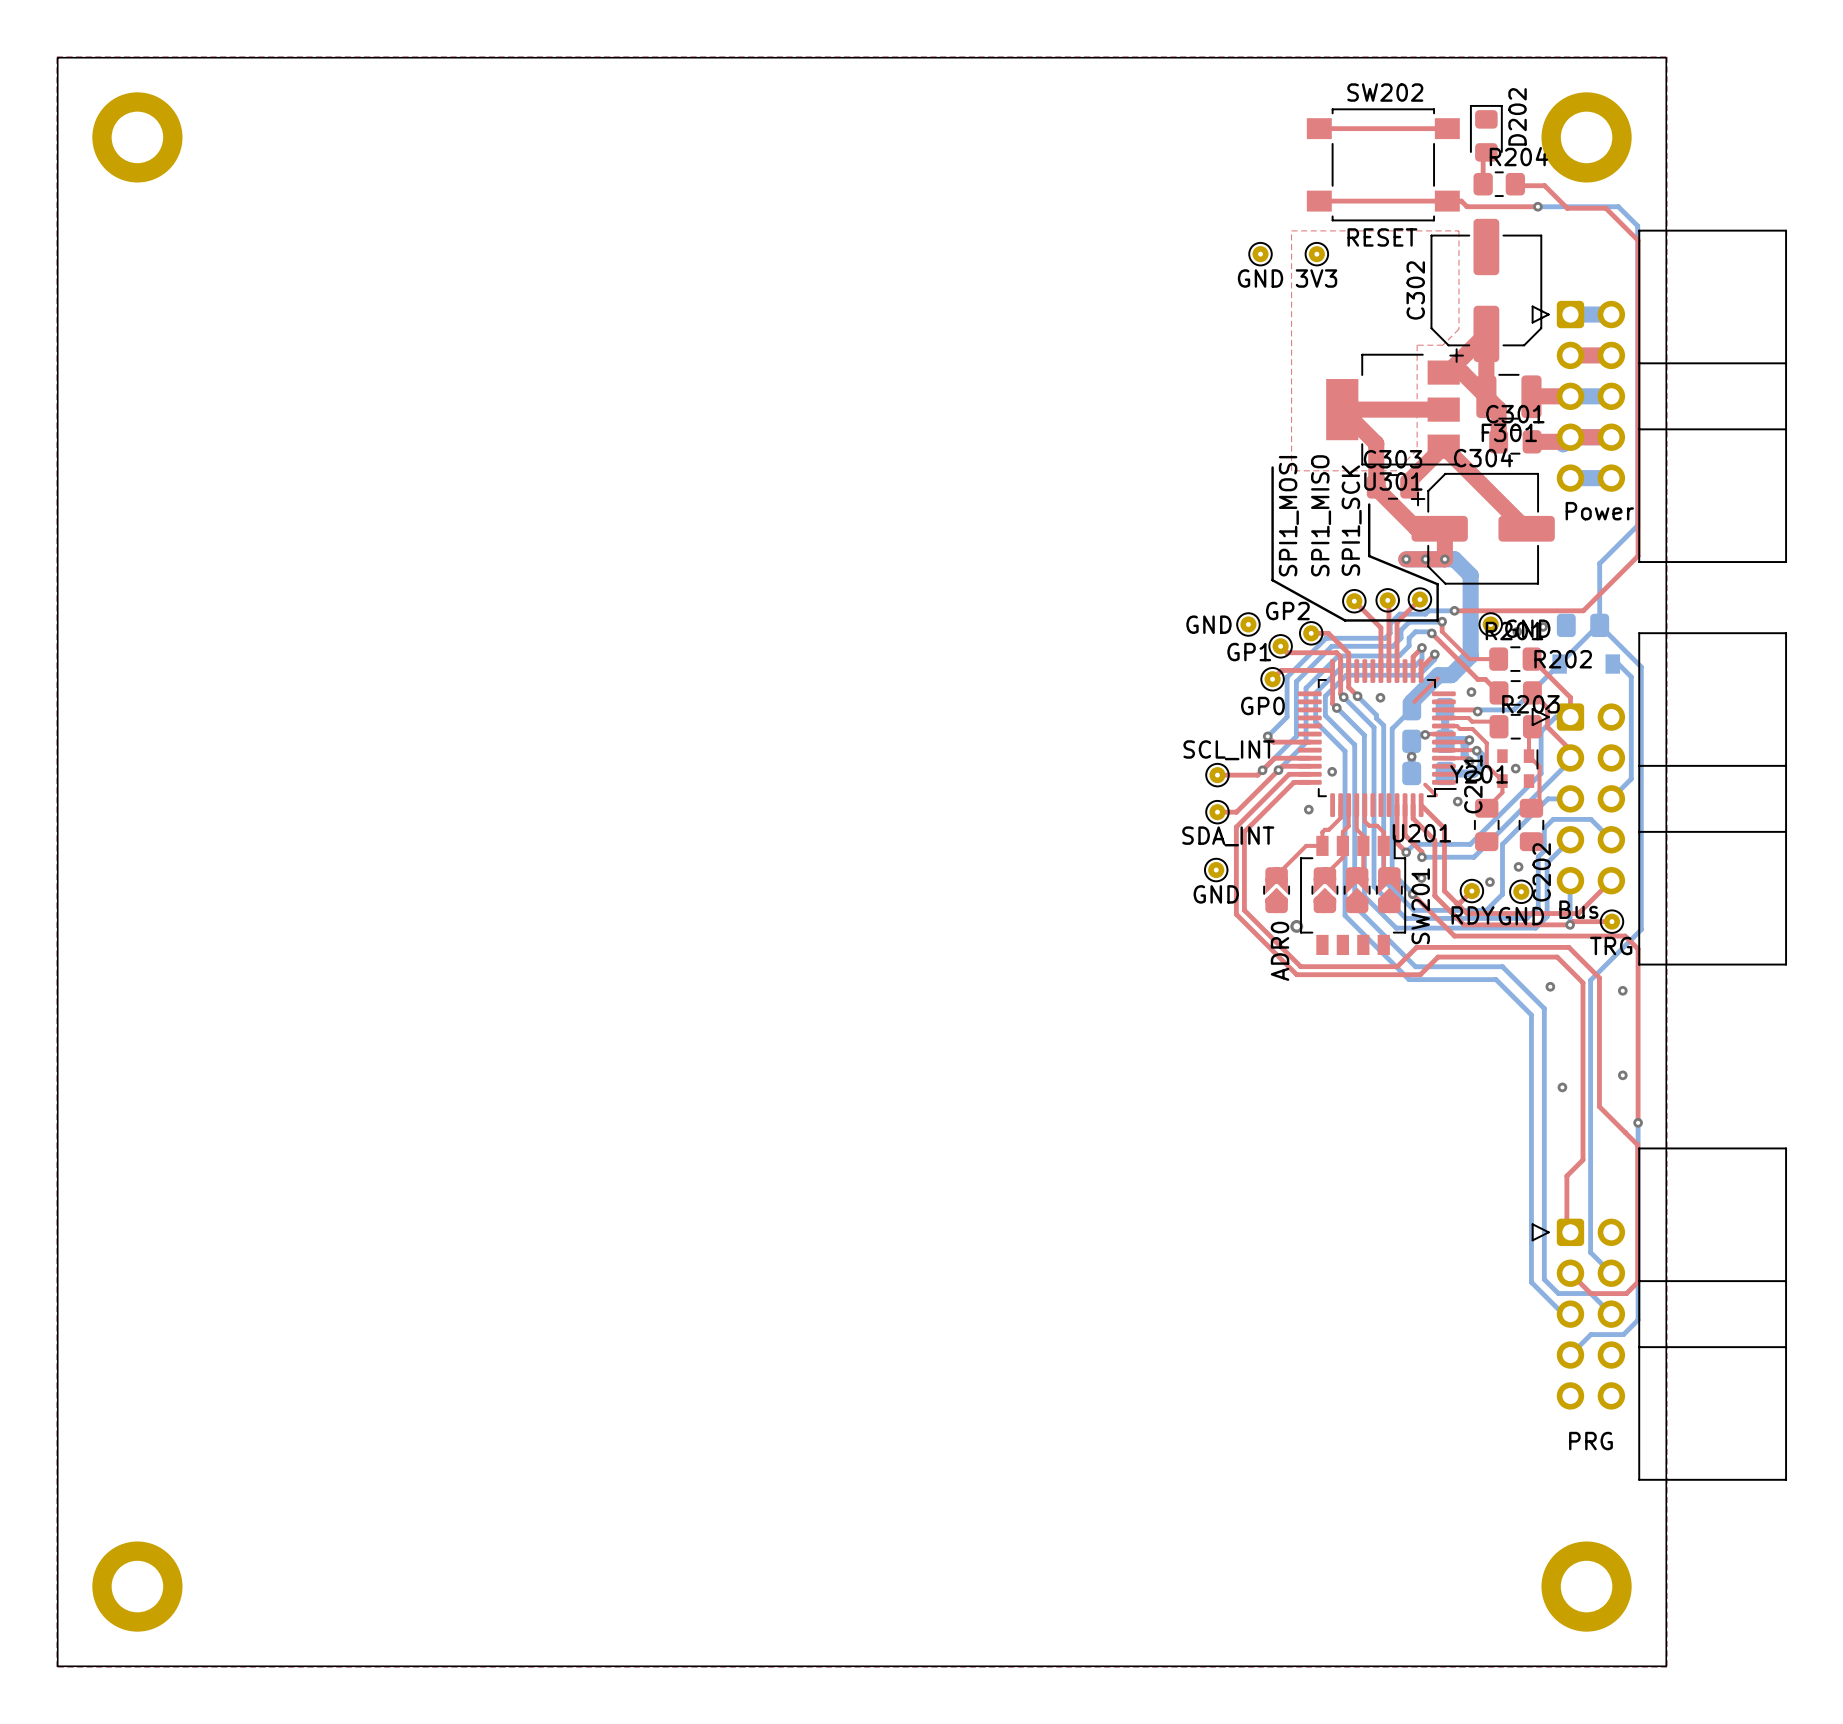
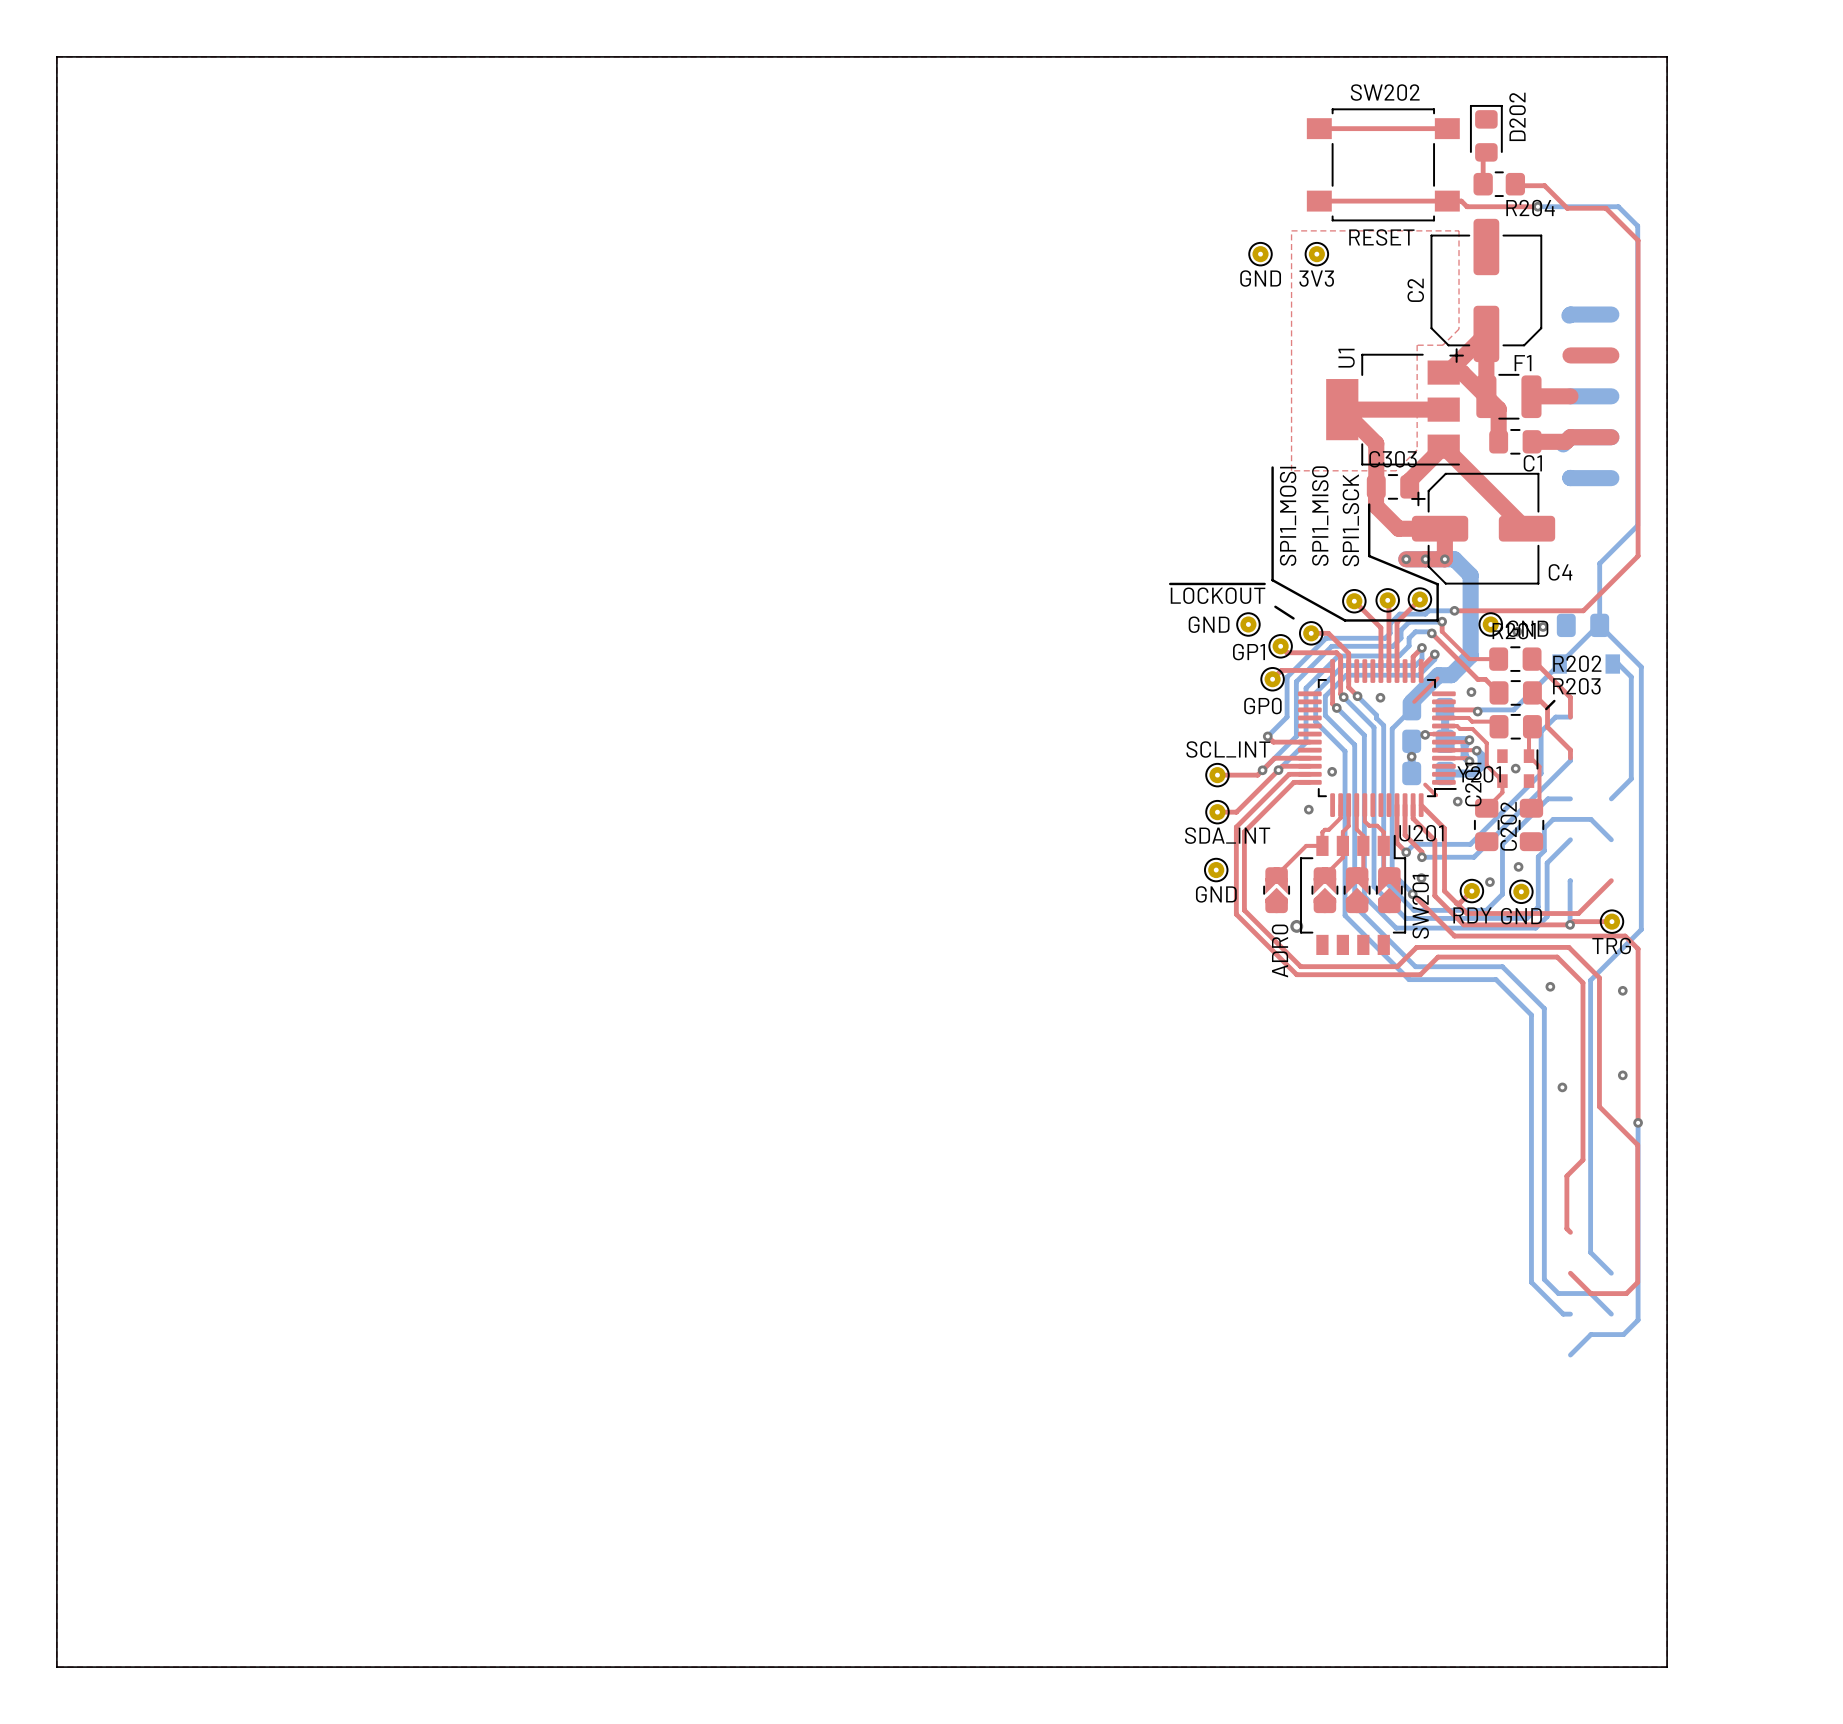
board edge: none -> (56, 56) (1667, 56) (1667, 1667) (56, 1667) (56, 56)
R204 name position: R204 (1518, 156) -> R204 (1530, 208)
C302 name: C302 (1415, 290) -> C2 (1415, 290)
C301 name: C301 (1515, 414) -> C1 (1532, 463)
F301 name: F301 (1509, 432) -> F1 (1523, 363)
U301 name: U301 (1393, 481) -> U1 (1346, 358)
top track: (1376, 486) (1416, 528) -> (1376, 486) (1376, 506) (1398, 528) (1416, 528)
C304: (1482, 528) -> none
C4: none -> (1483, 528)
line: none -> (1275, 606) (1293, 618)
part value: GP2 (1287, 611) -> ~{LOCKOUT} (1217, 593)
R202 name position: R202 (1563, 659) -> R202 (1577, 663)
R203 name position: R203 (1530, 704) -> R203 (1576, 686)
part: (921, 861) -> none
C202 name position: C202 (1541, 872) -> C202 (1508, 826)

